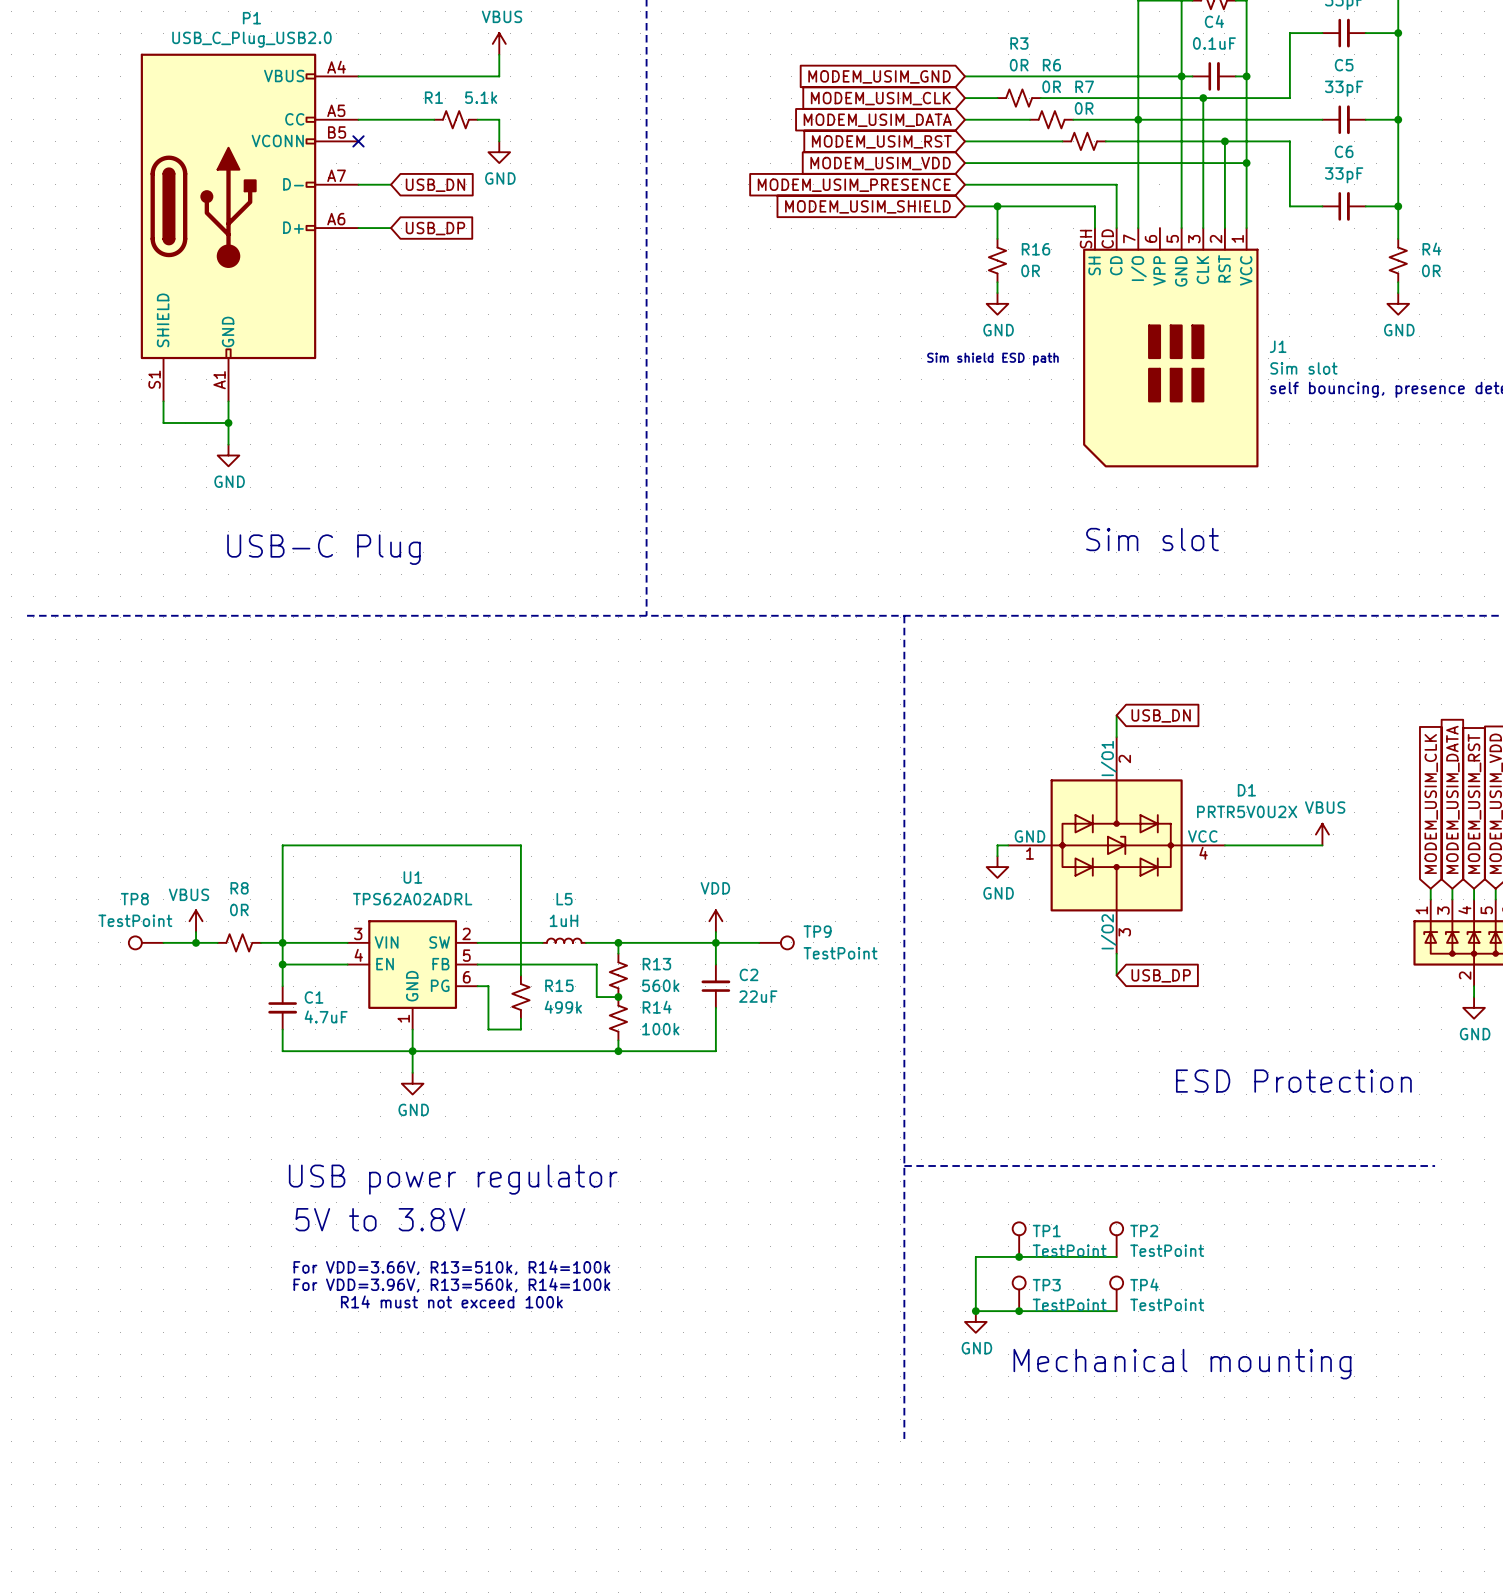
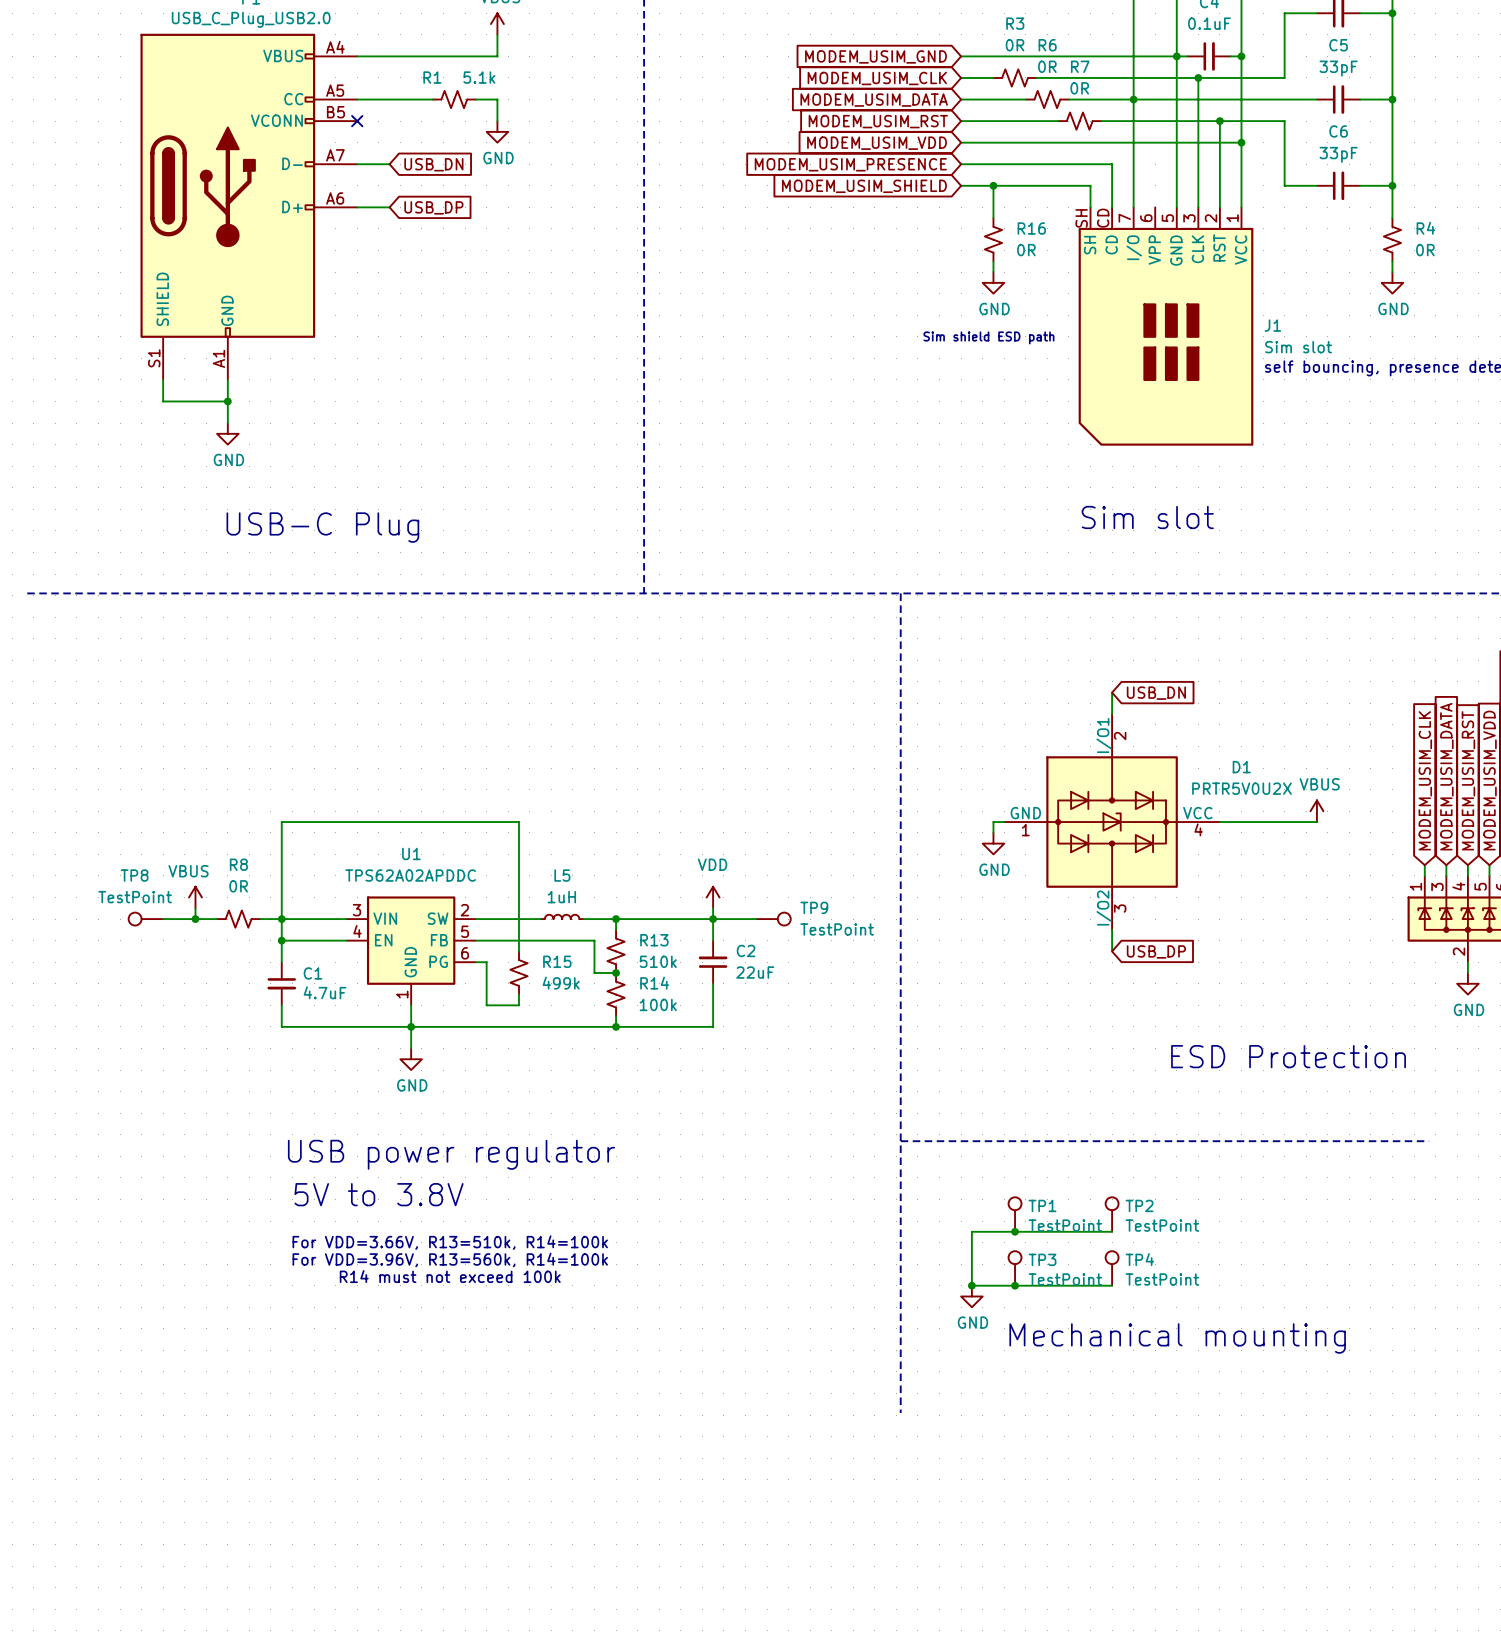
U1 value: TPS62A02ADRL (412, 899) -> TPS62A02APDDC (410, 875)
R13 value: 560k (660, 985) -> 510k (658, 961)

